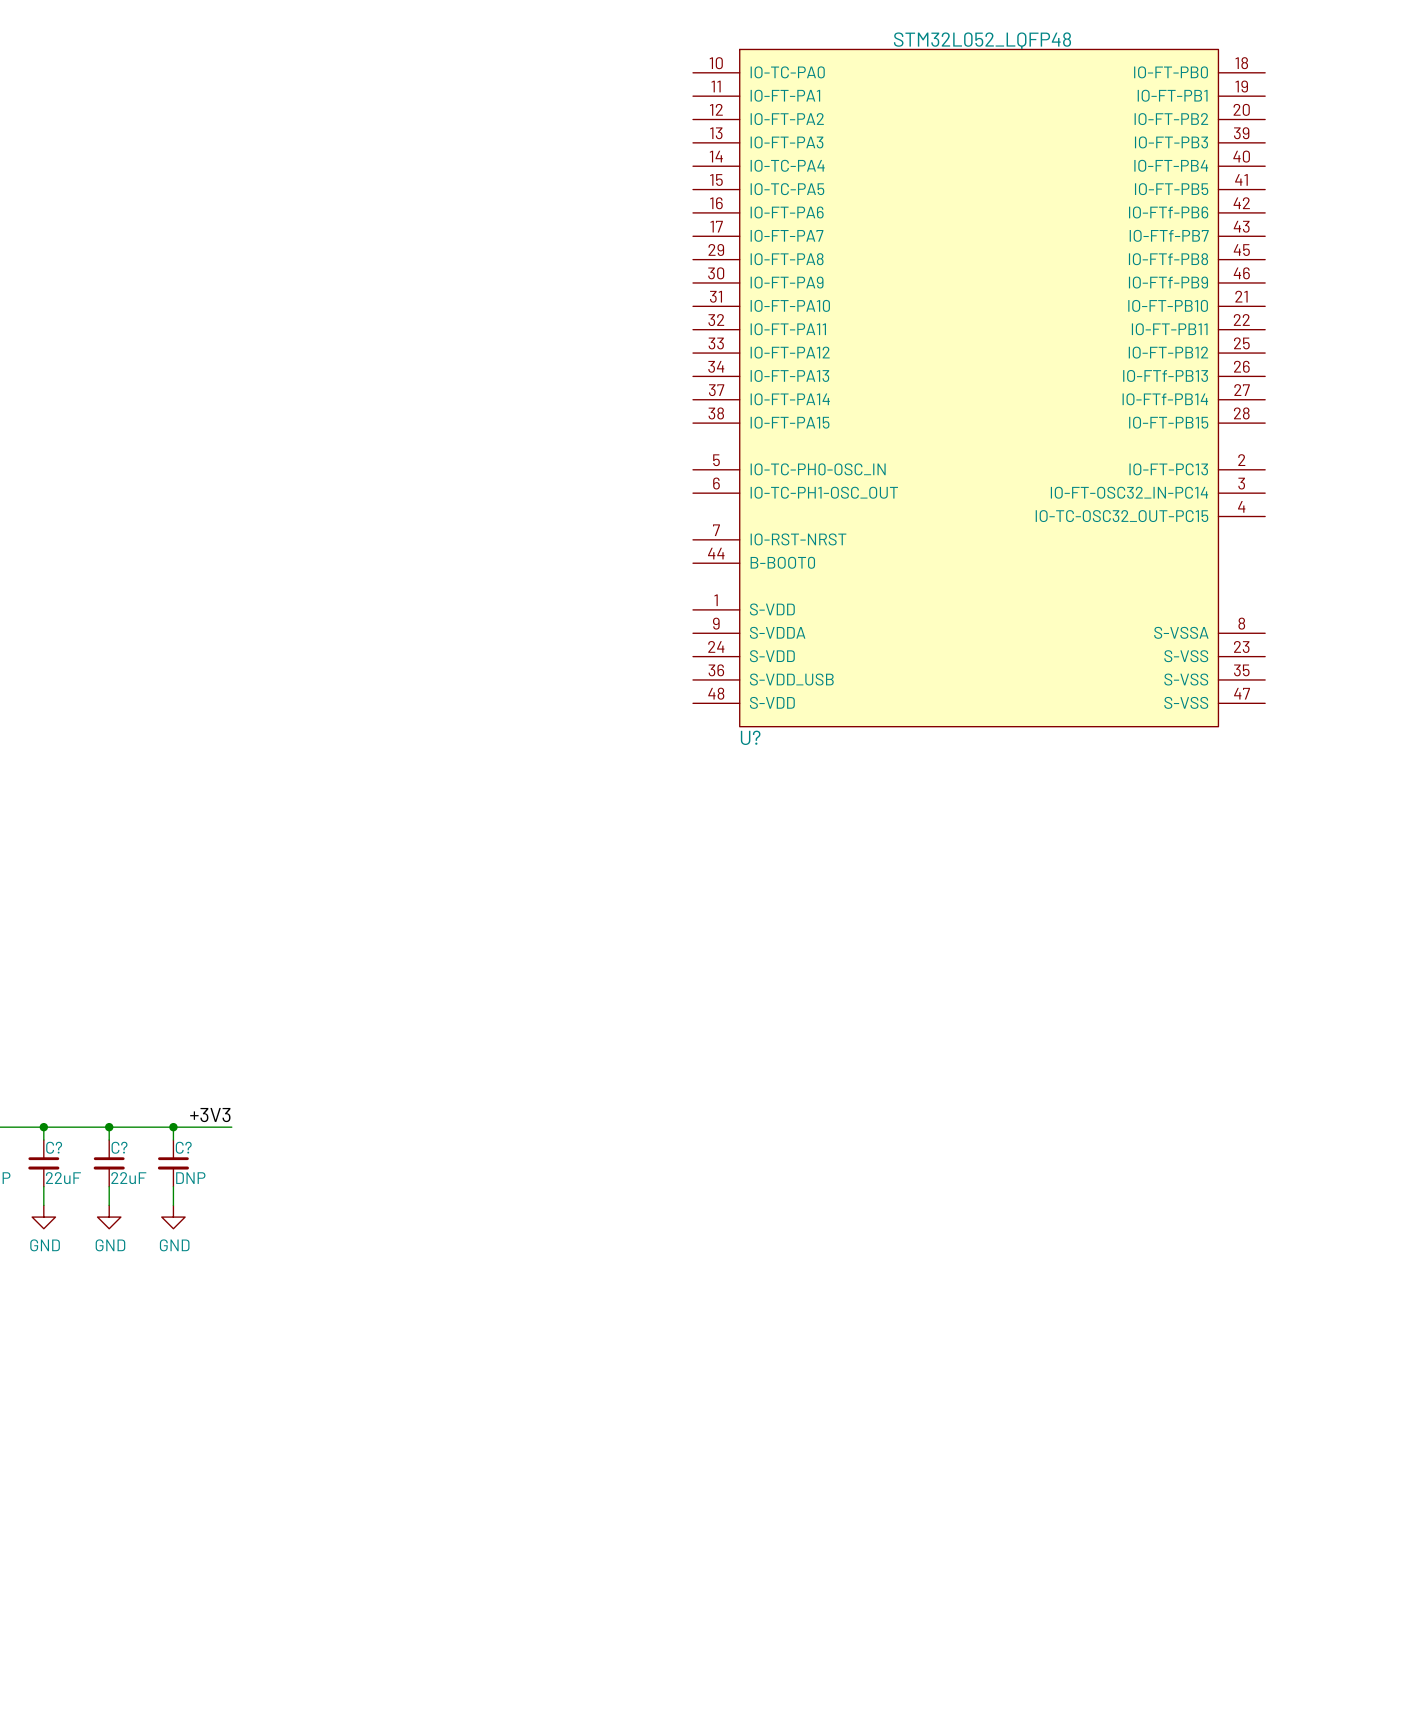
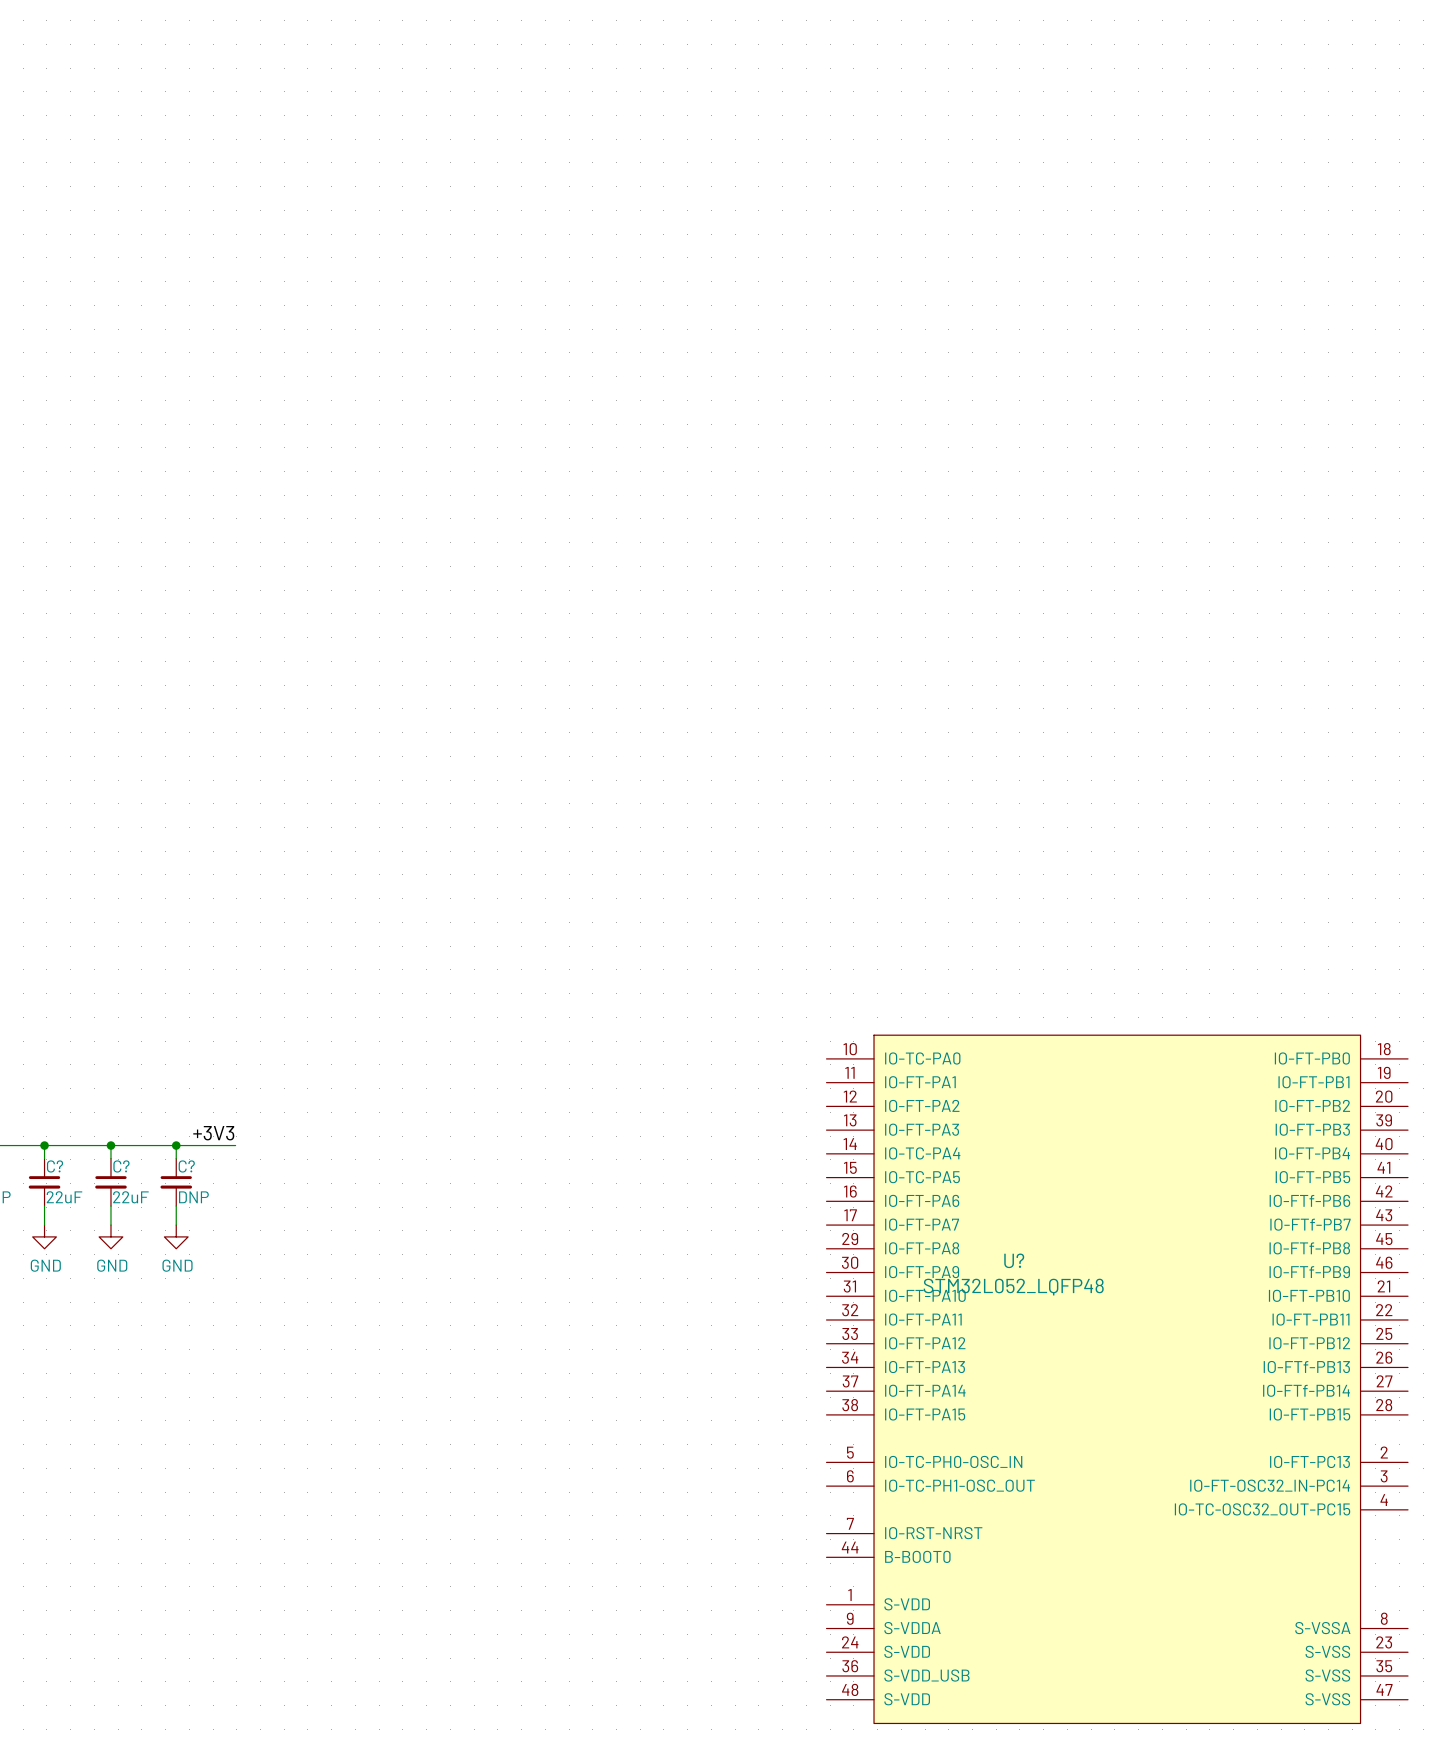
U?: STM32L052_LQFP48 (979, 388) -> none
U?: none -> STM32L052_LQFP48 (1117, 1379)

